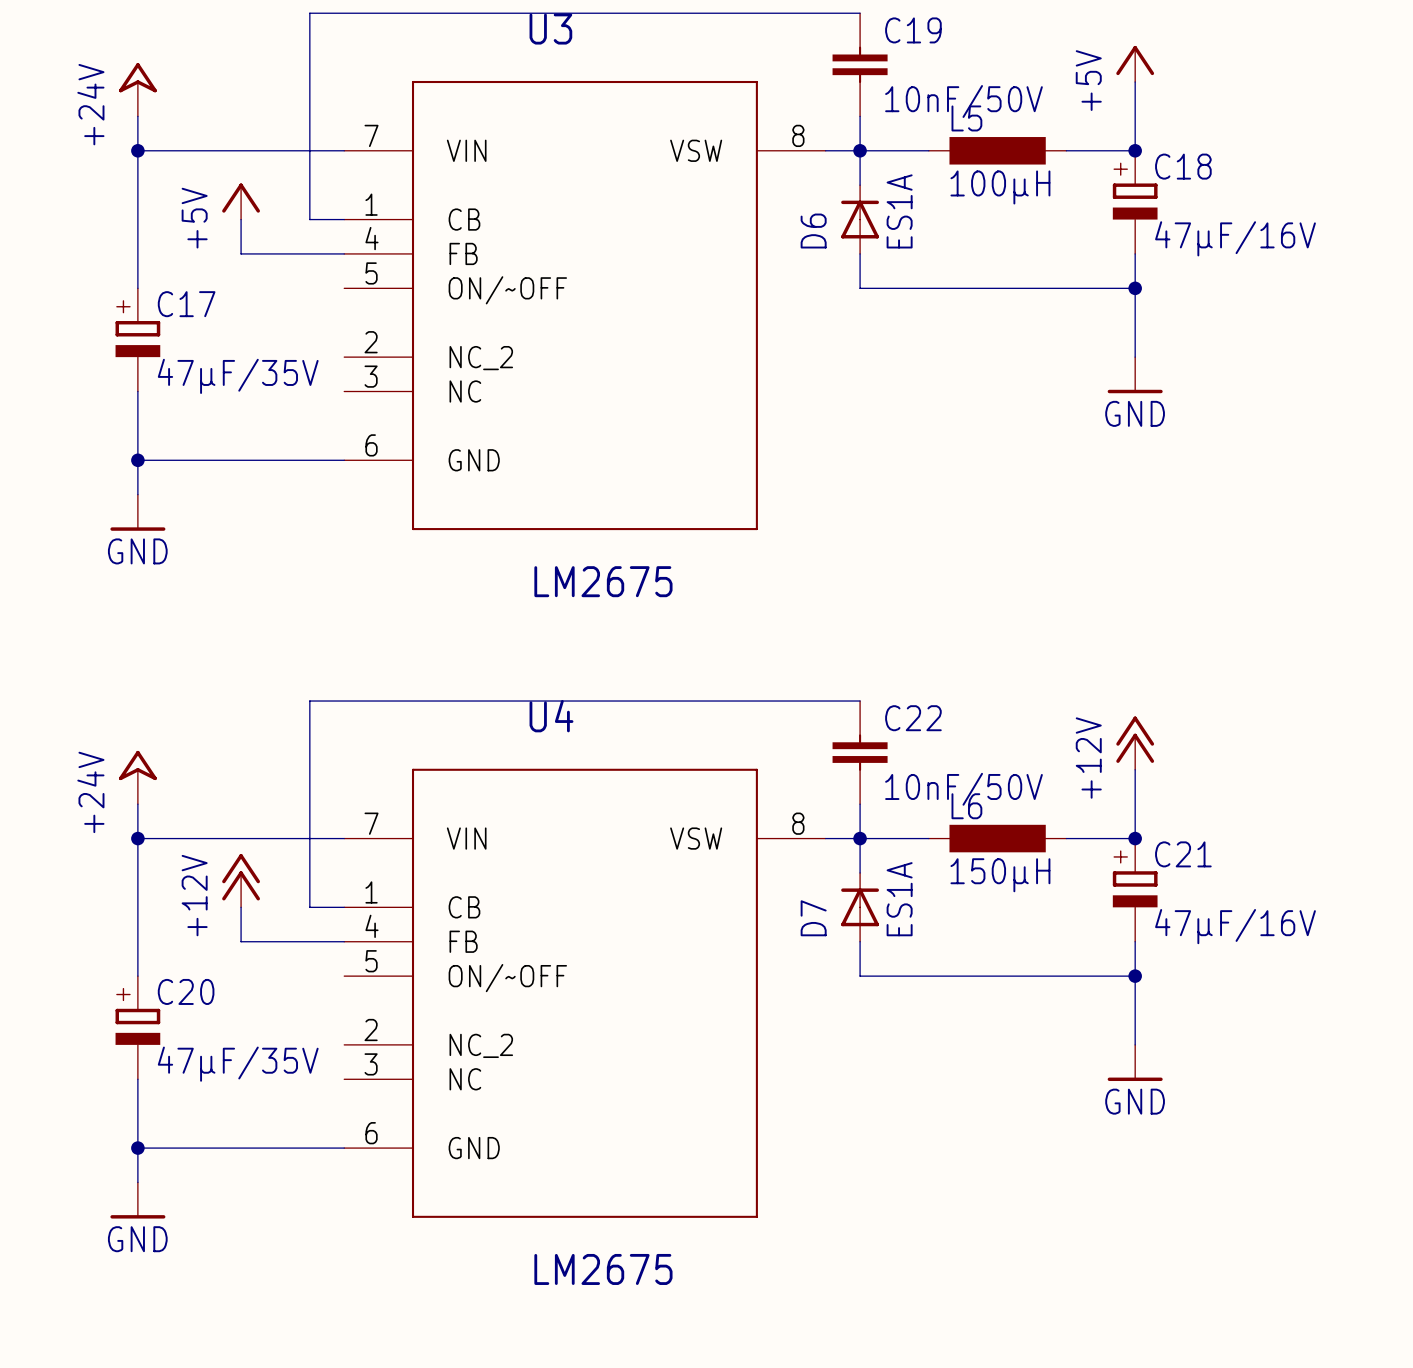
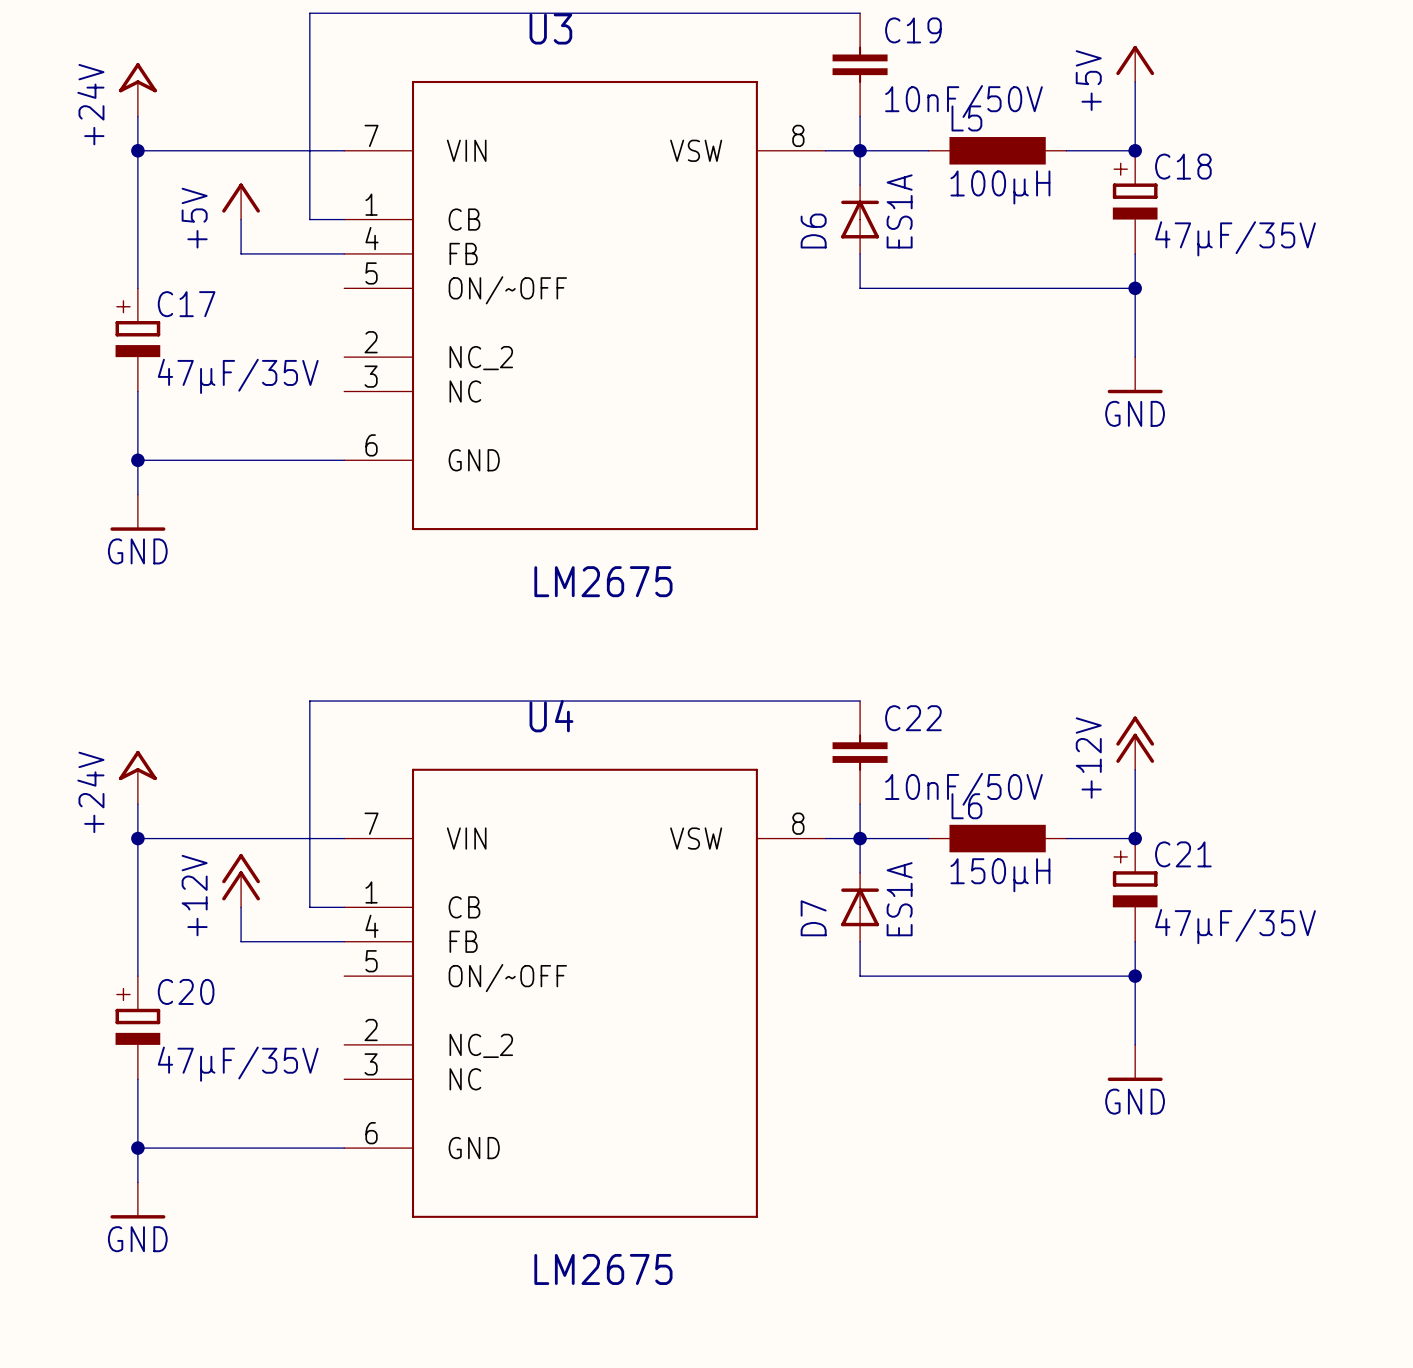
C18 value: 47µF/16V (1235, 238) -> 47µF/35V (1235, 238)
C21 value: 47µF/16V (1235, 926) -> 47µF/35V (1235, 926)

